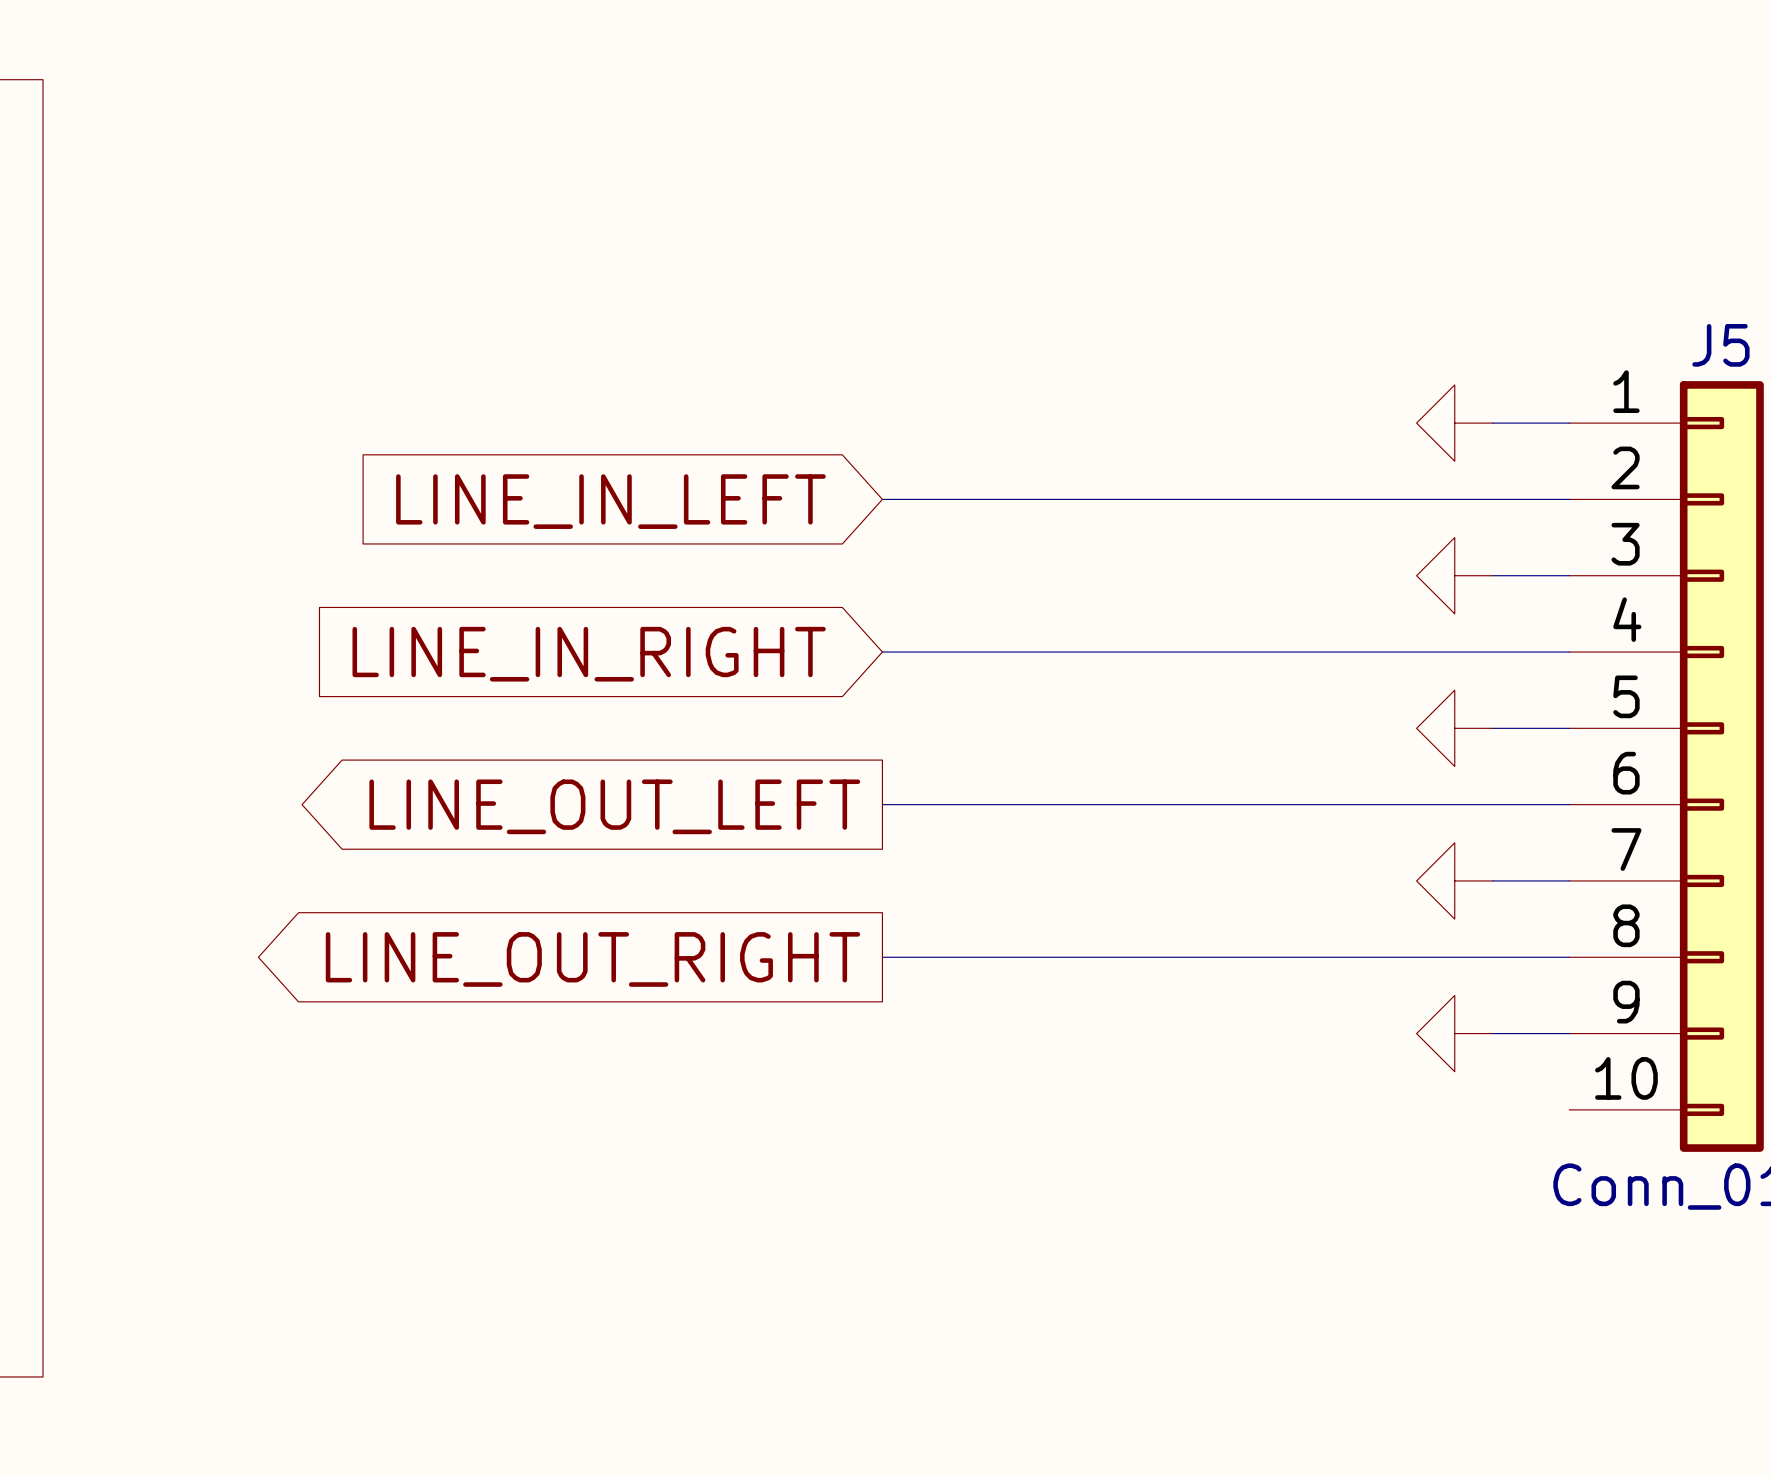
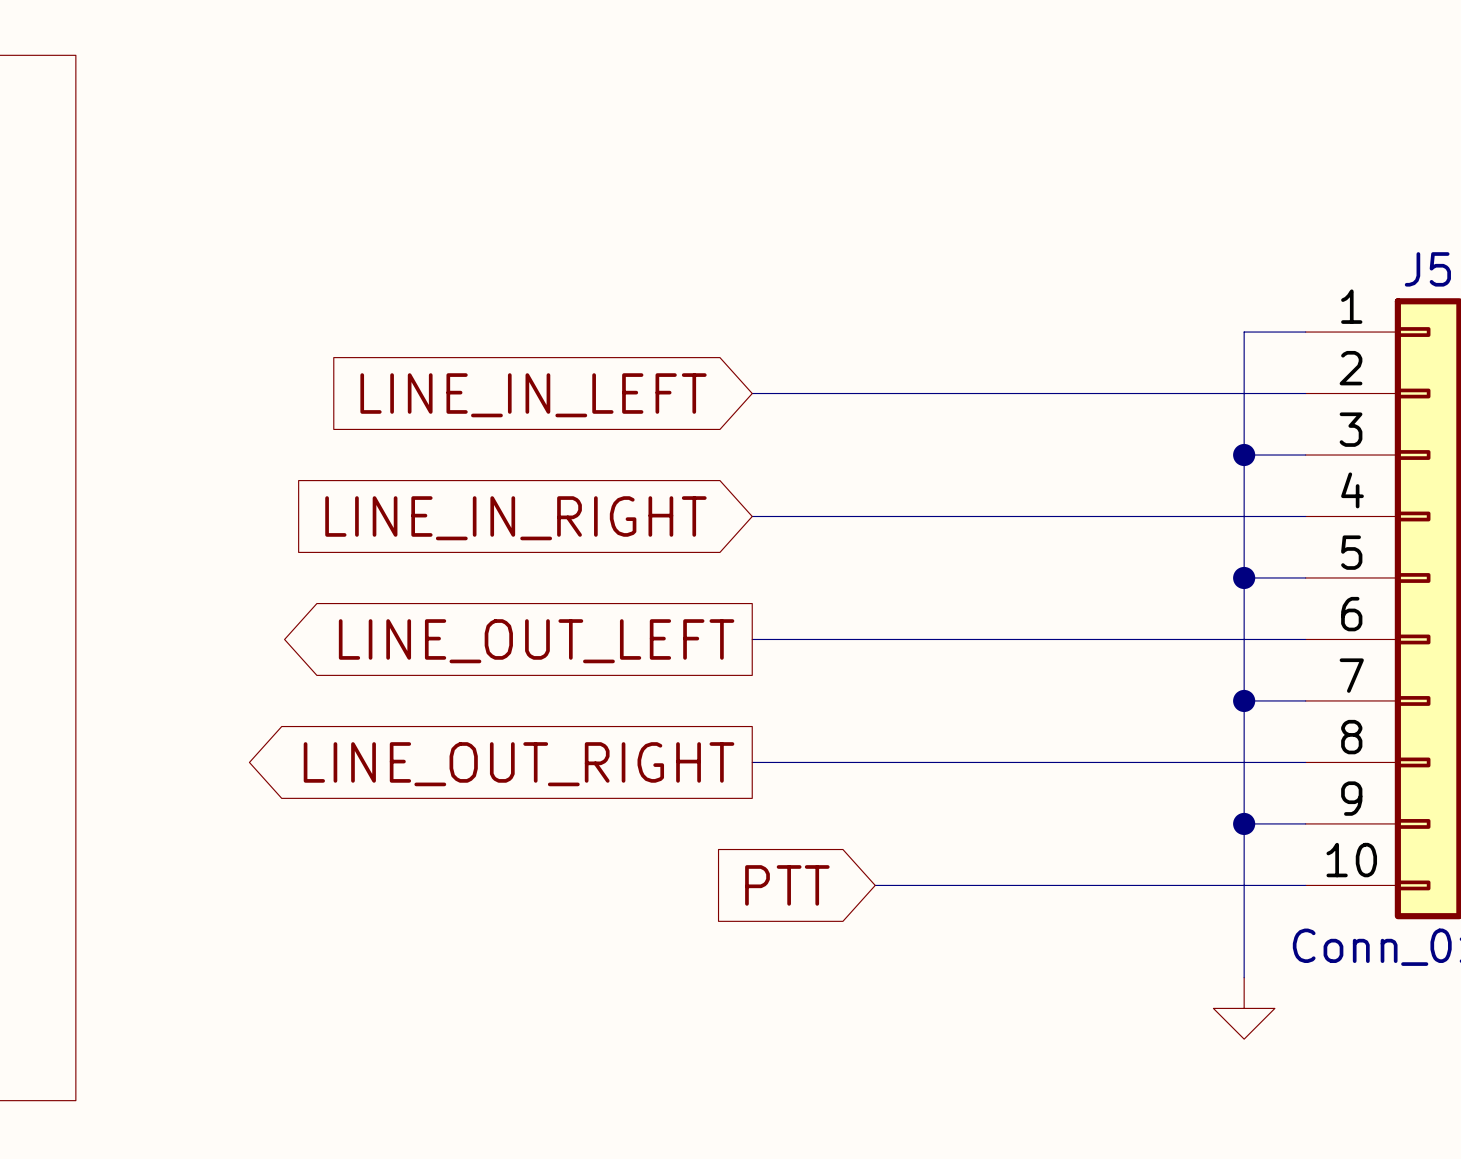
power symbol: (1454, 423) -> none
wire: none -> (1244, 332) (1244, 977)
power symbol: (1454, 575) -> none
junction: none -> (1244, 455)
power symbol: (1454, 728) -> none
junction: none -> (1244, 577)
power symbol: (1454, 880) -> none
junction: none -> (1244, 700)
power symbol: (1454, 1033) -> none
junction: none -> (1244, 823)
global label: none -> PTT (787, 885)
wire: none -> (875, 885) (1305, 885)
power symbol: none -> (1244, 1008)

